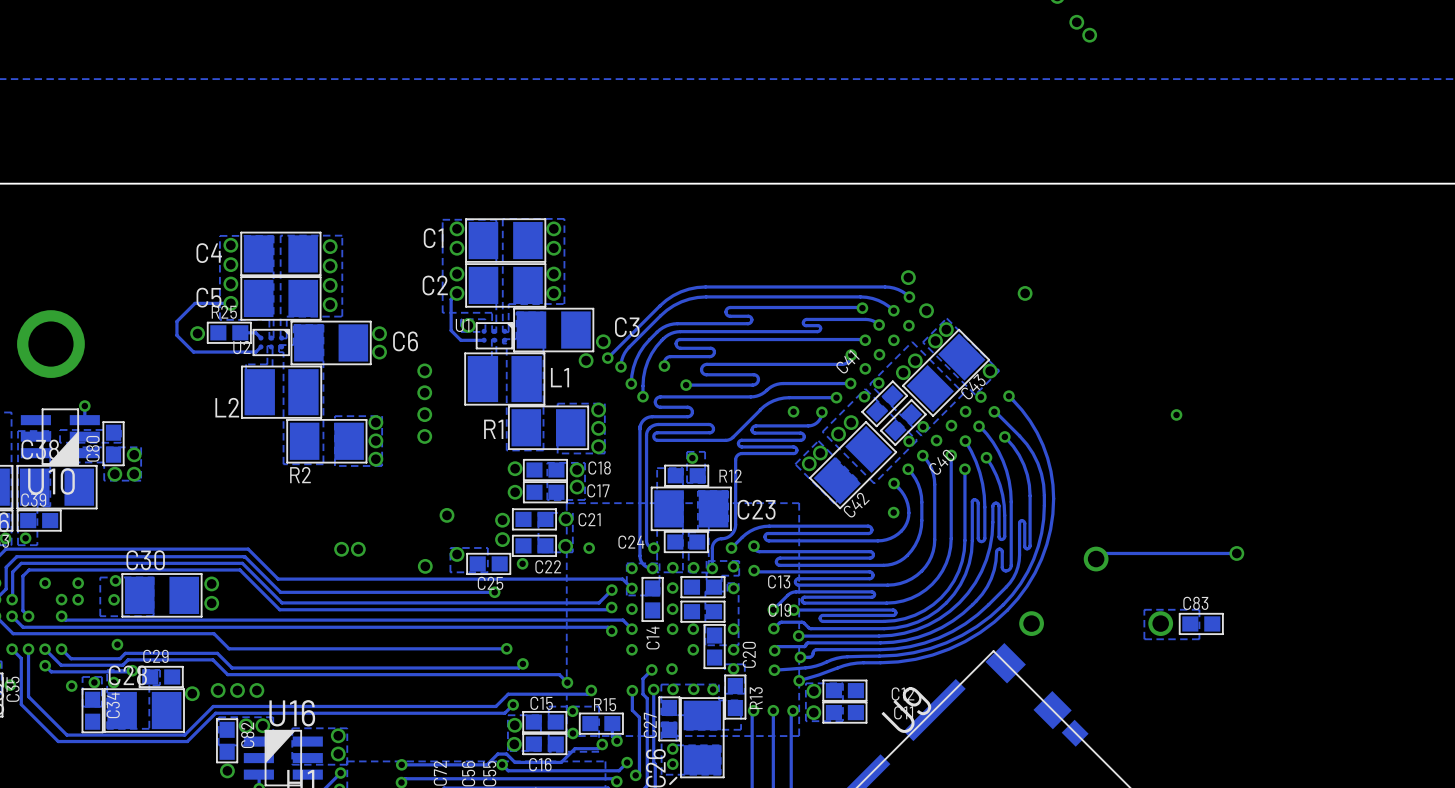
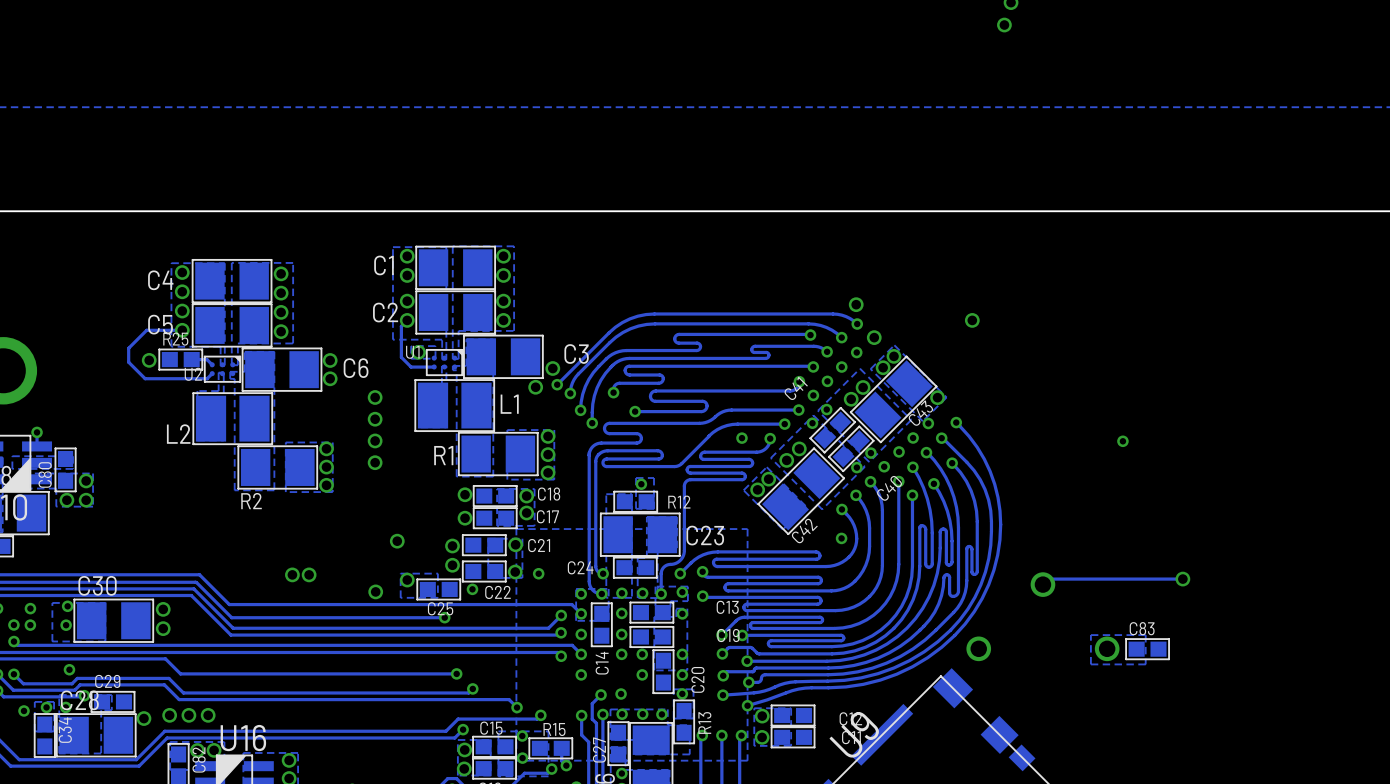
via: (1076, 22) -> none
via: (1089, 35) -> none

